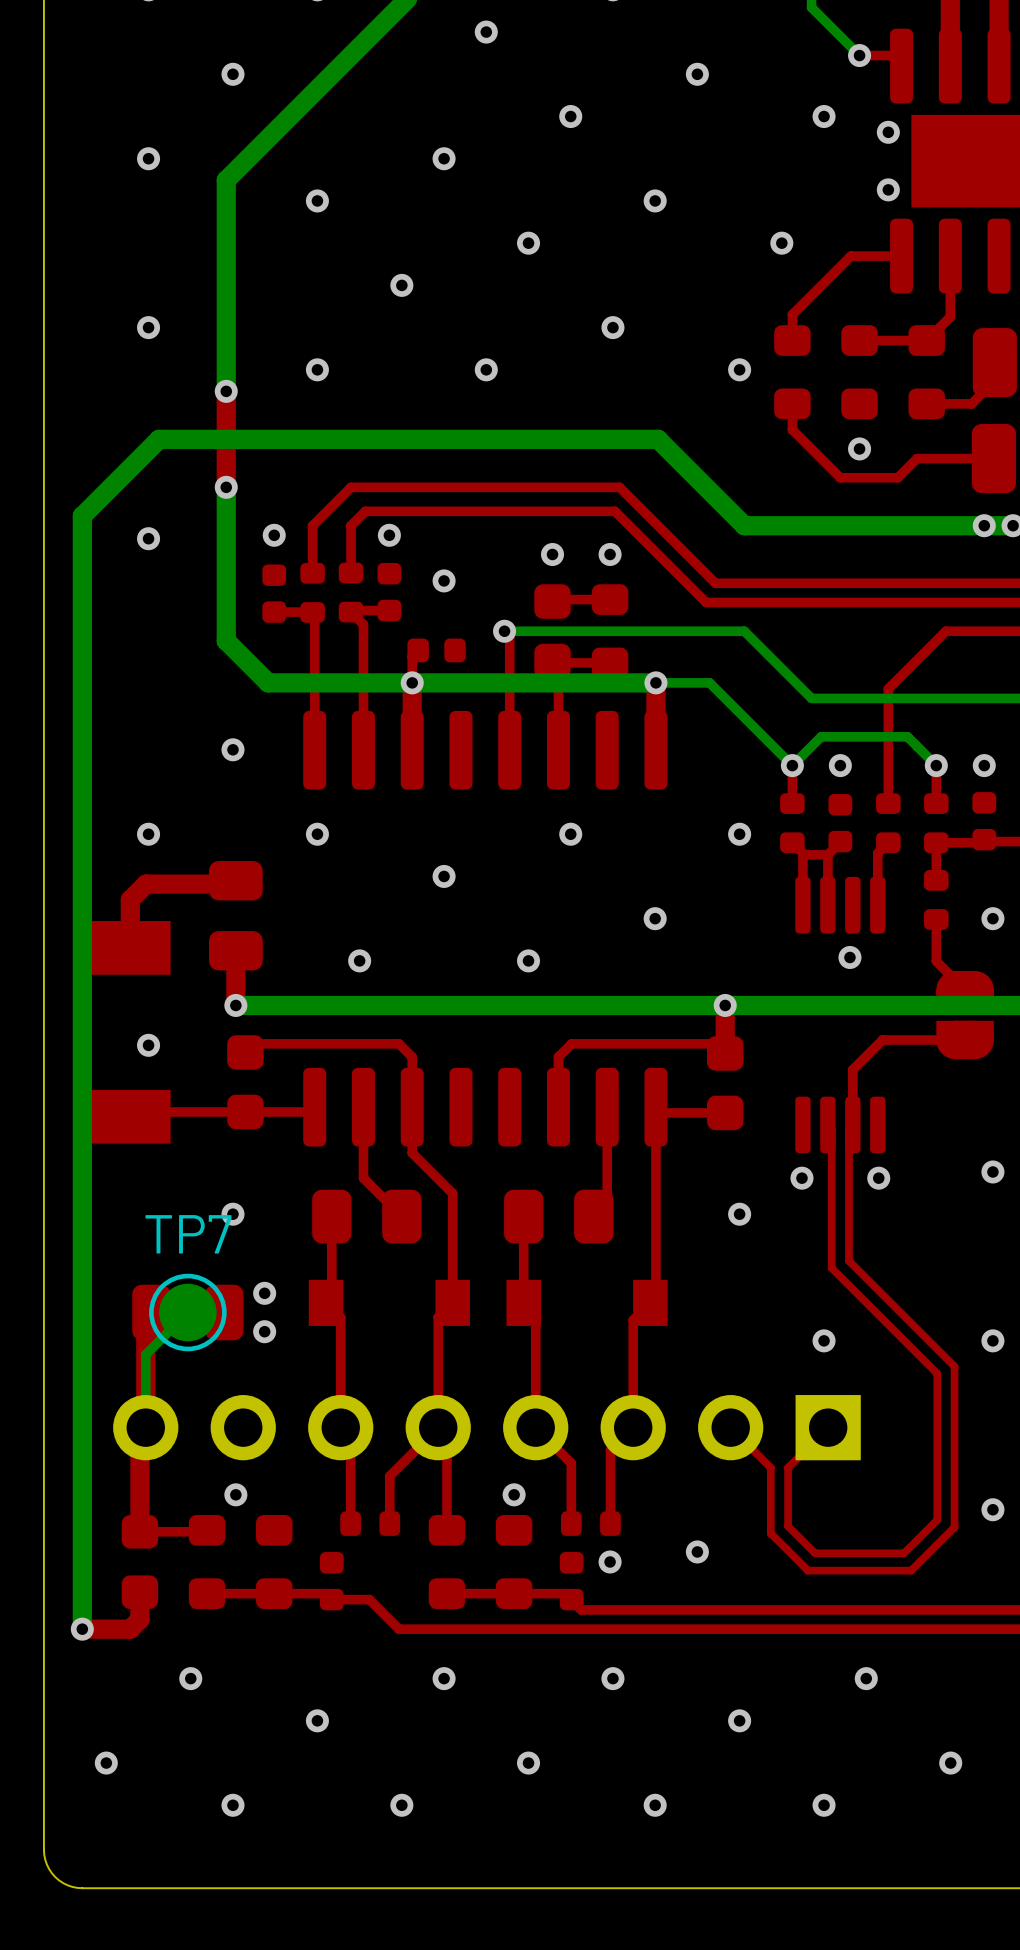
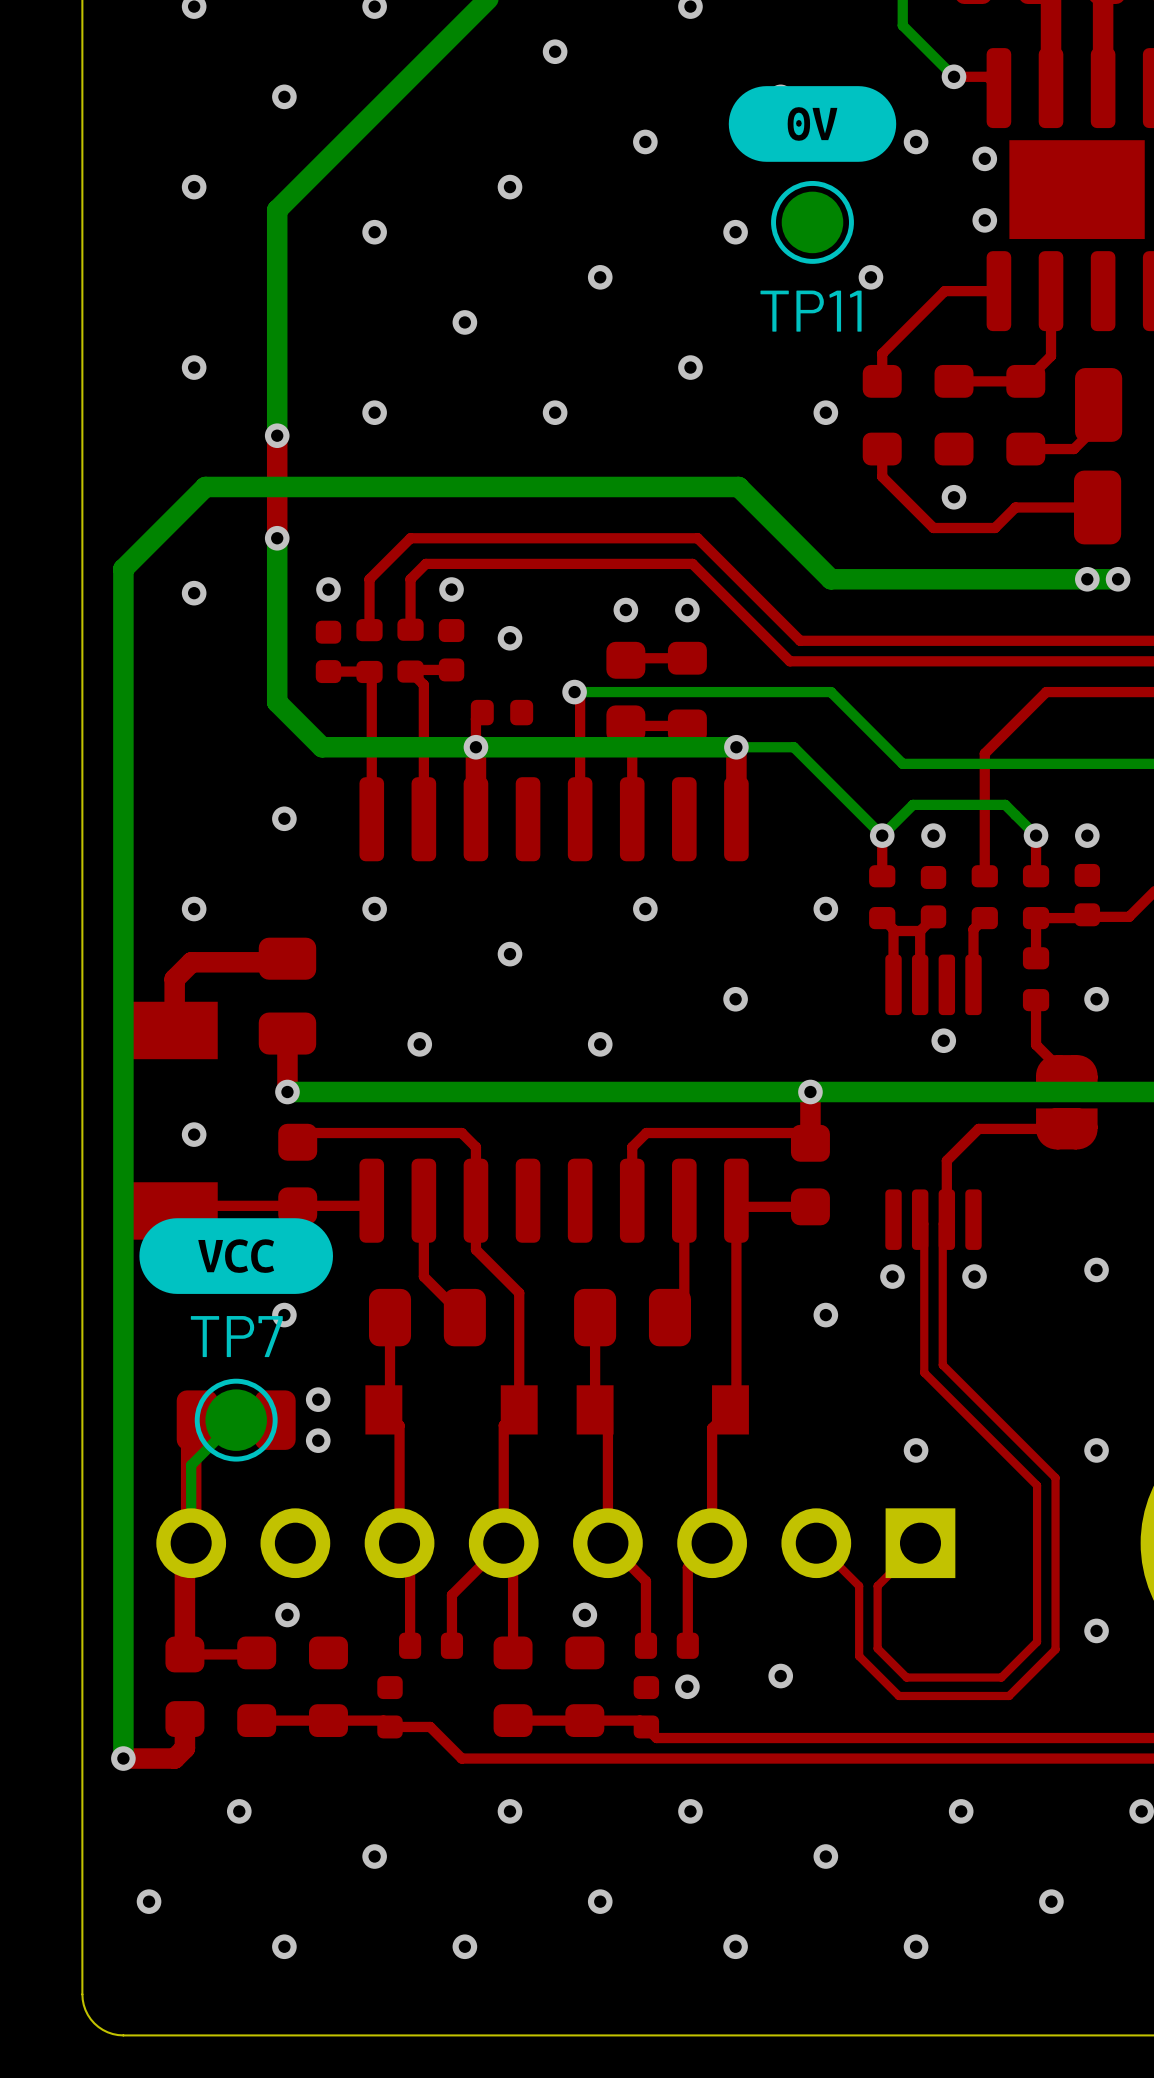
drawing: none -> [728, 86, 897, 162]
TP11: none -> (812, 222)
drawing: none -> [139, 1218, 334, 1294]

